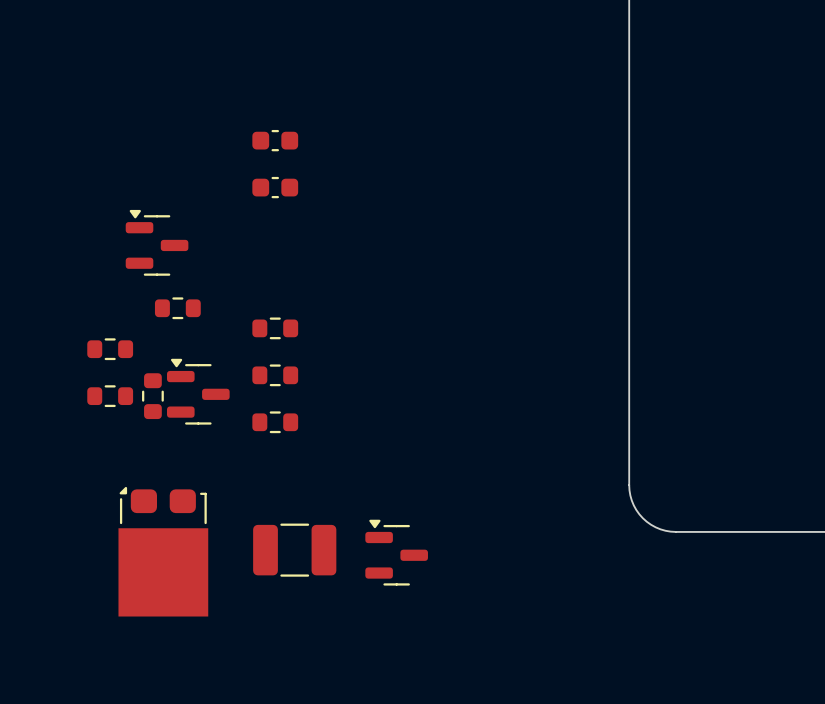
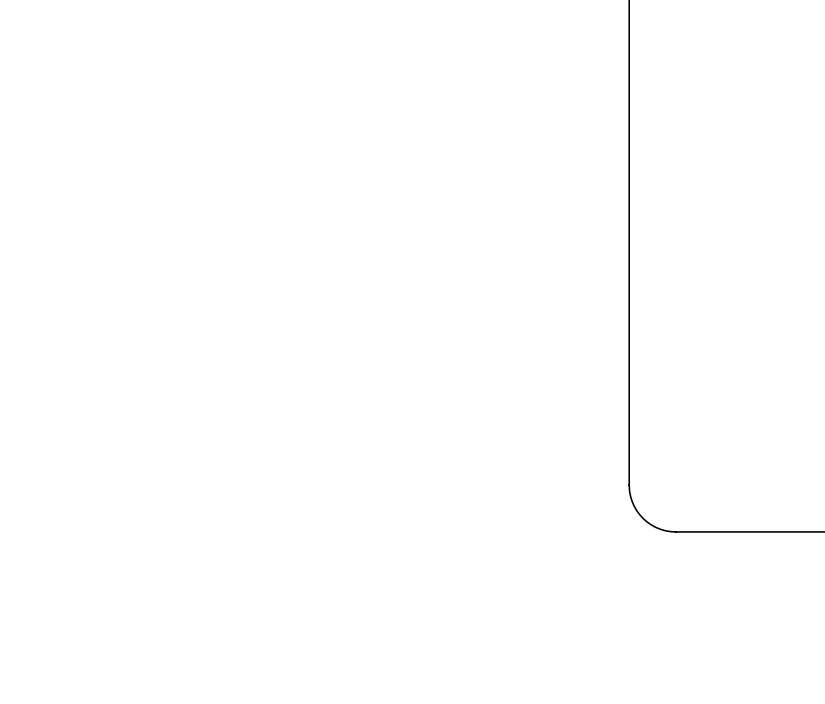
part: (275, 140) -> none
part: (275, 187) -> none
part: (157, 242) -> none
part: (177, 308) -> none
part: (275, 328) -> none
part: (110, 349) -> none
part: (275, 375) -> none
part: (198, 391) -> none
part: (110, 396) -> none
part: (152, 396) -> none
part: (275, 422) -> none
part: (294, 550) -> none
part: (163, 551) -> none
part: (396, 552) -> none

